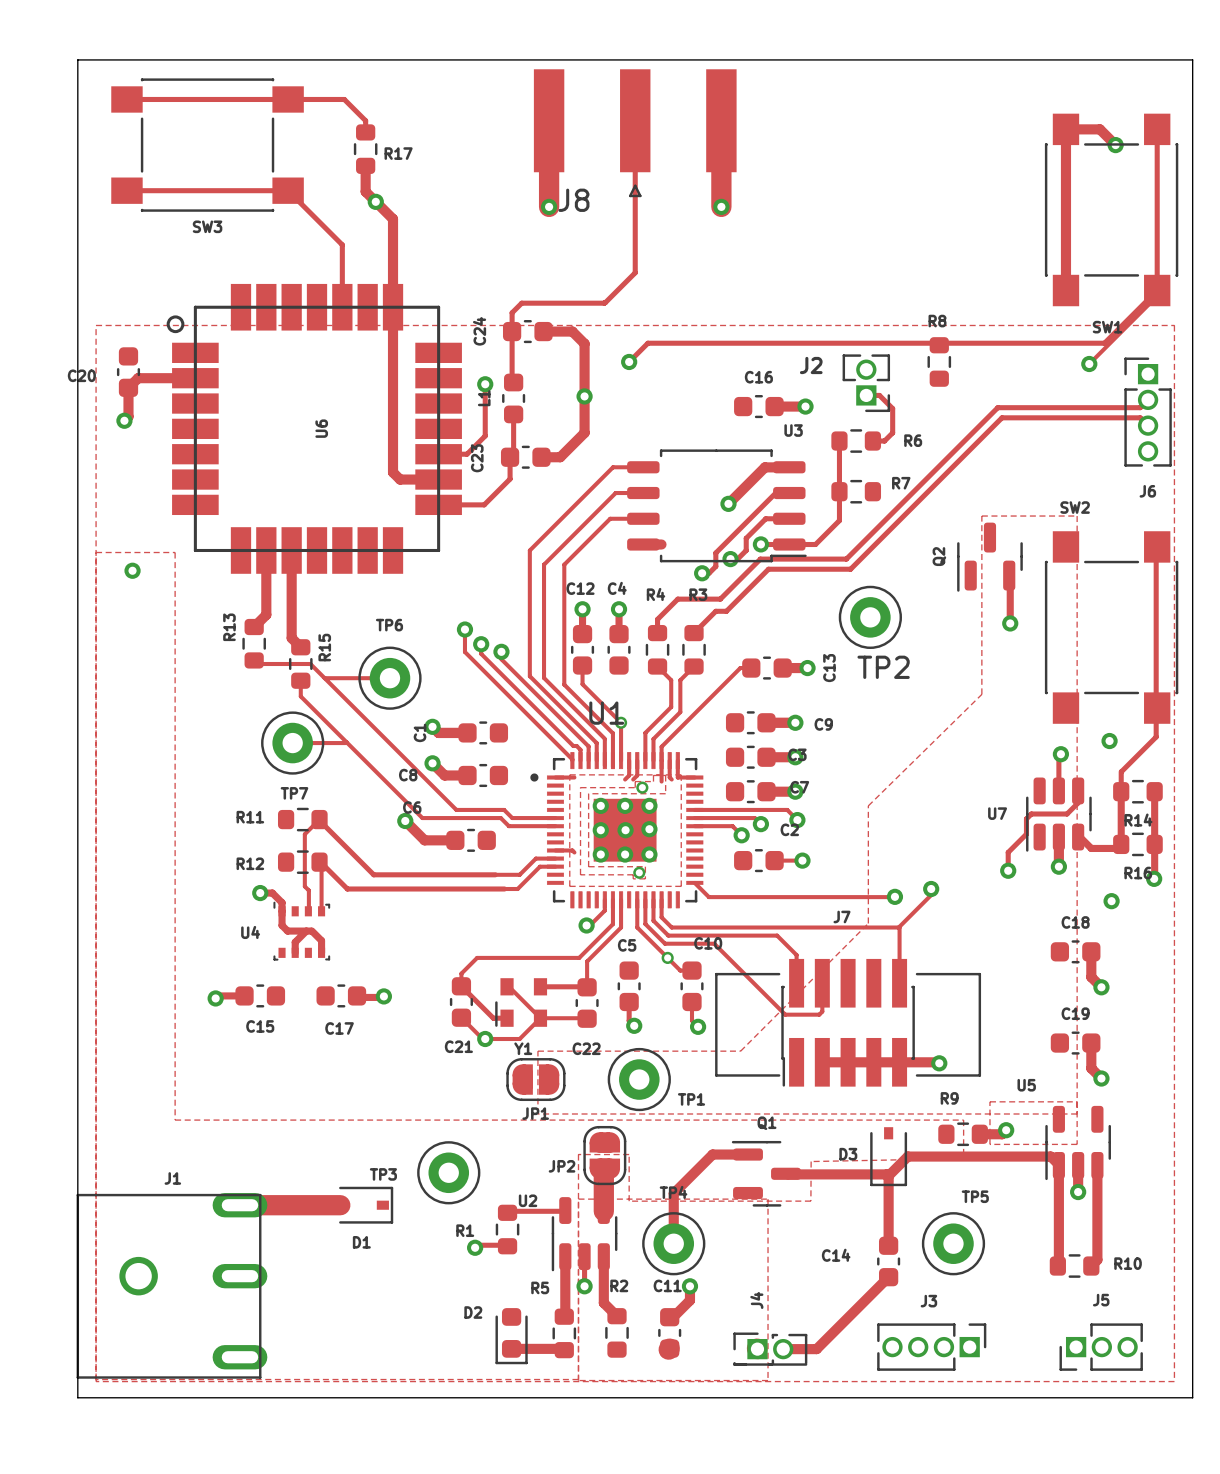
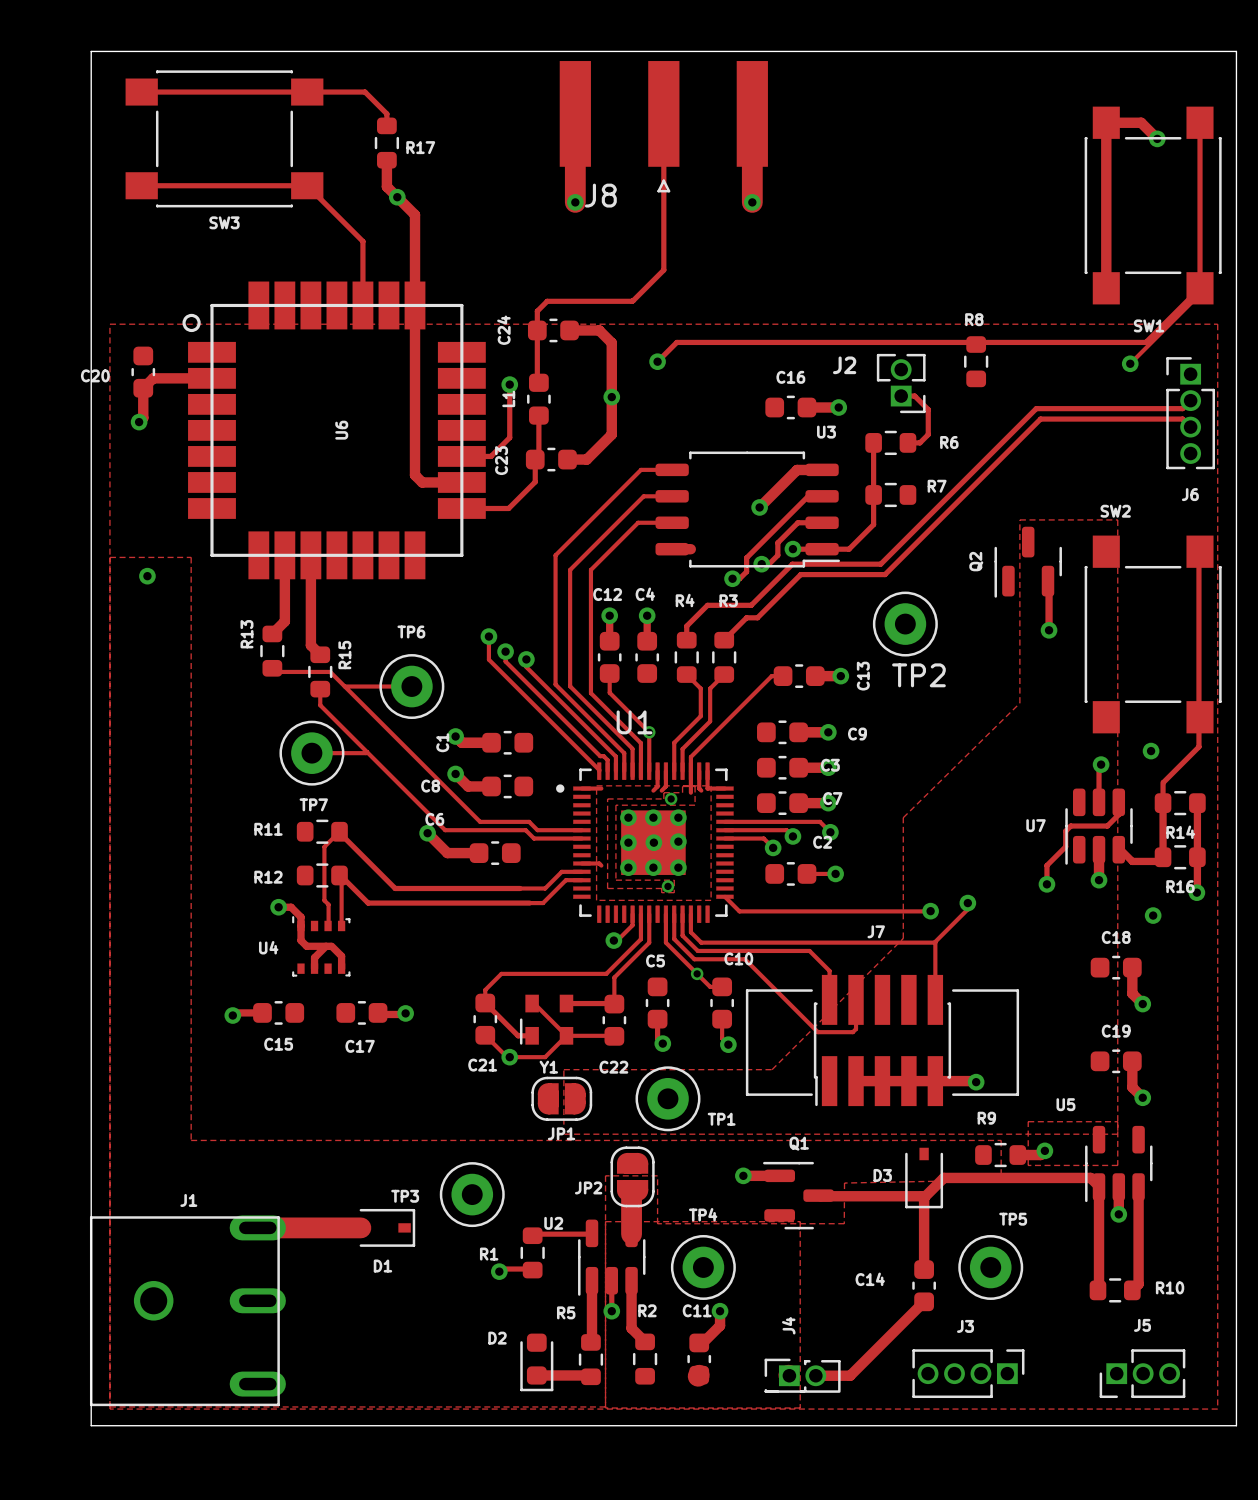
track: (712, 1154) (673, 1193) (673, 1243) -> none
via: none -> (743, 1175)

